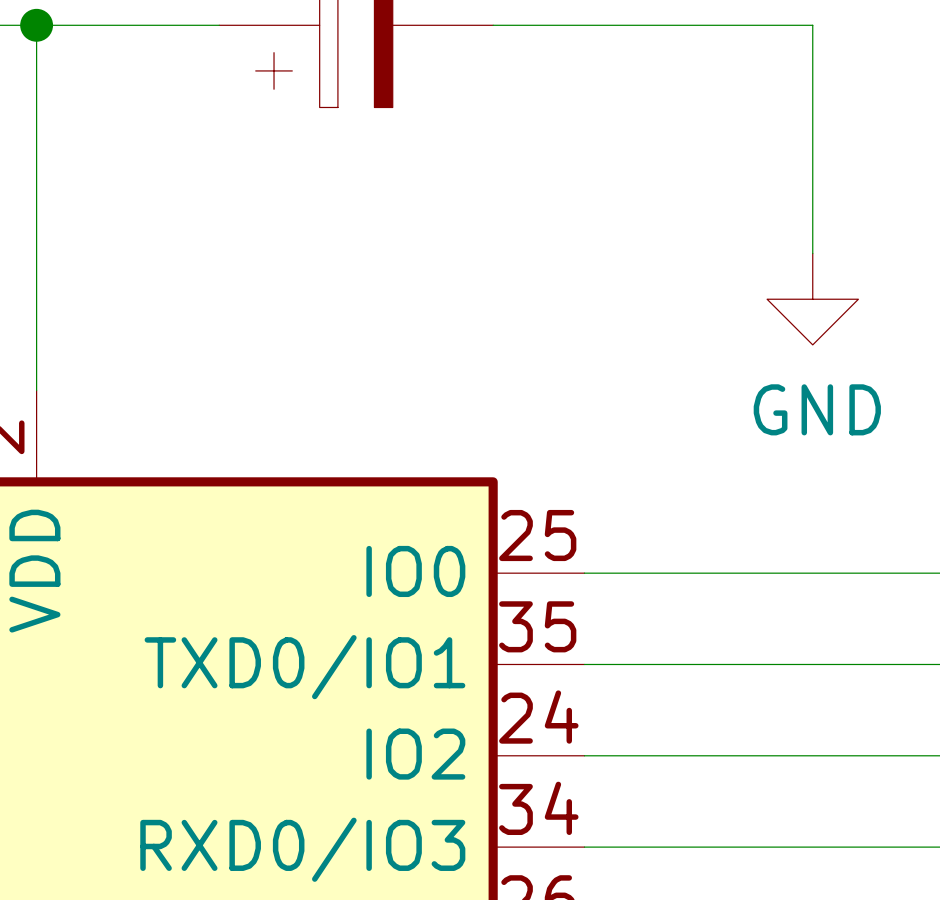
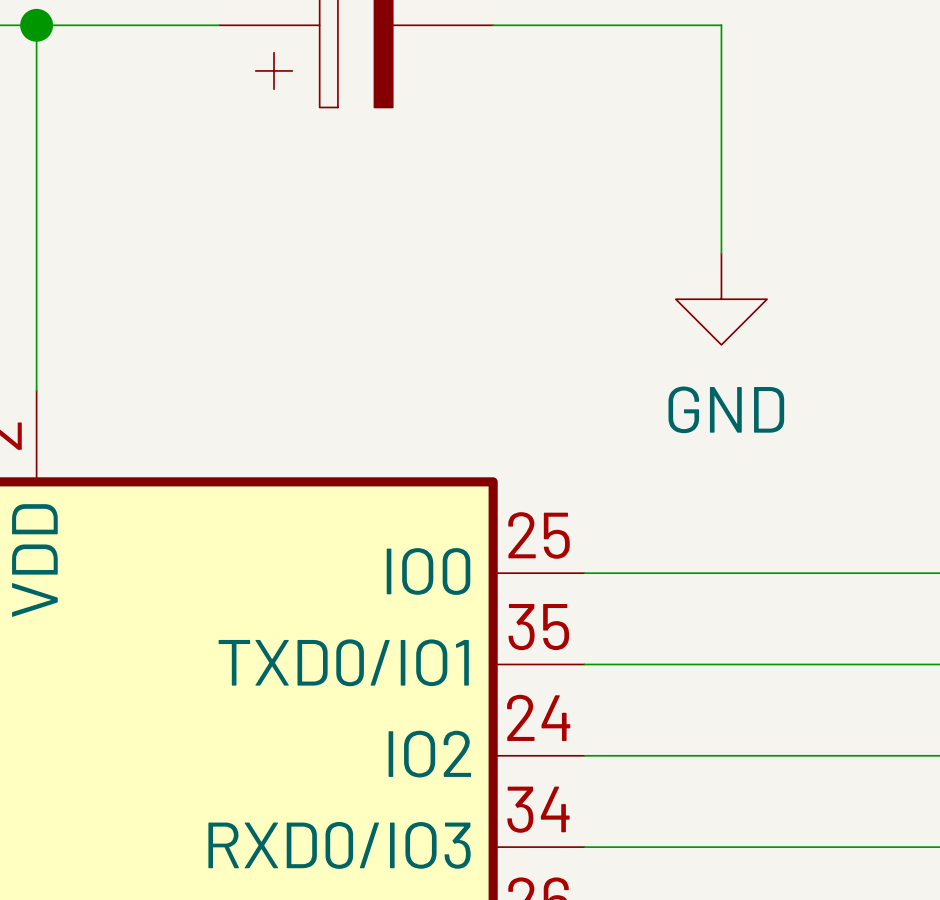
wire: (721, 25) (812, 25) (812, 253) -> (721, 25) (721, 253)
power symbol position: GND (812, 299) -> GND (721, 299)

